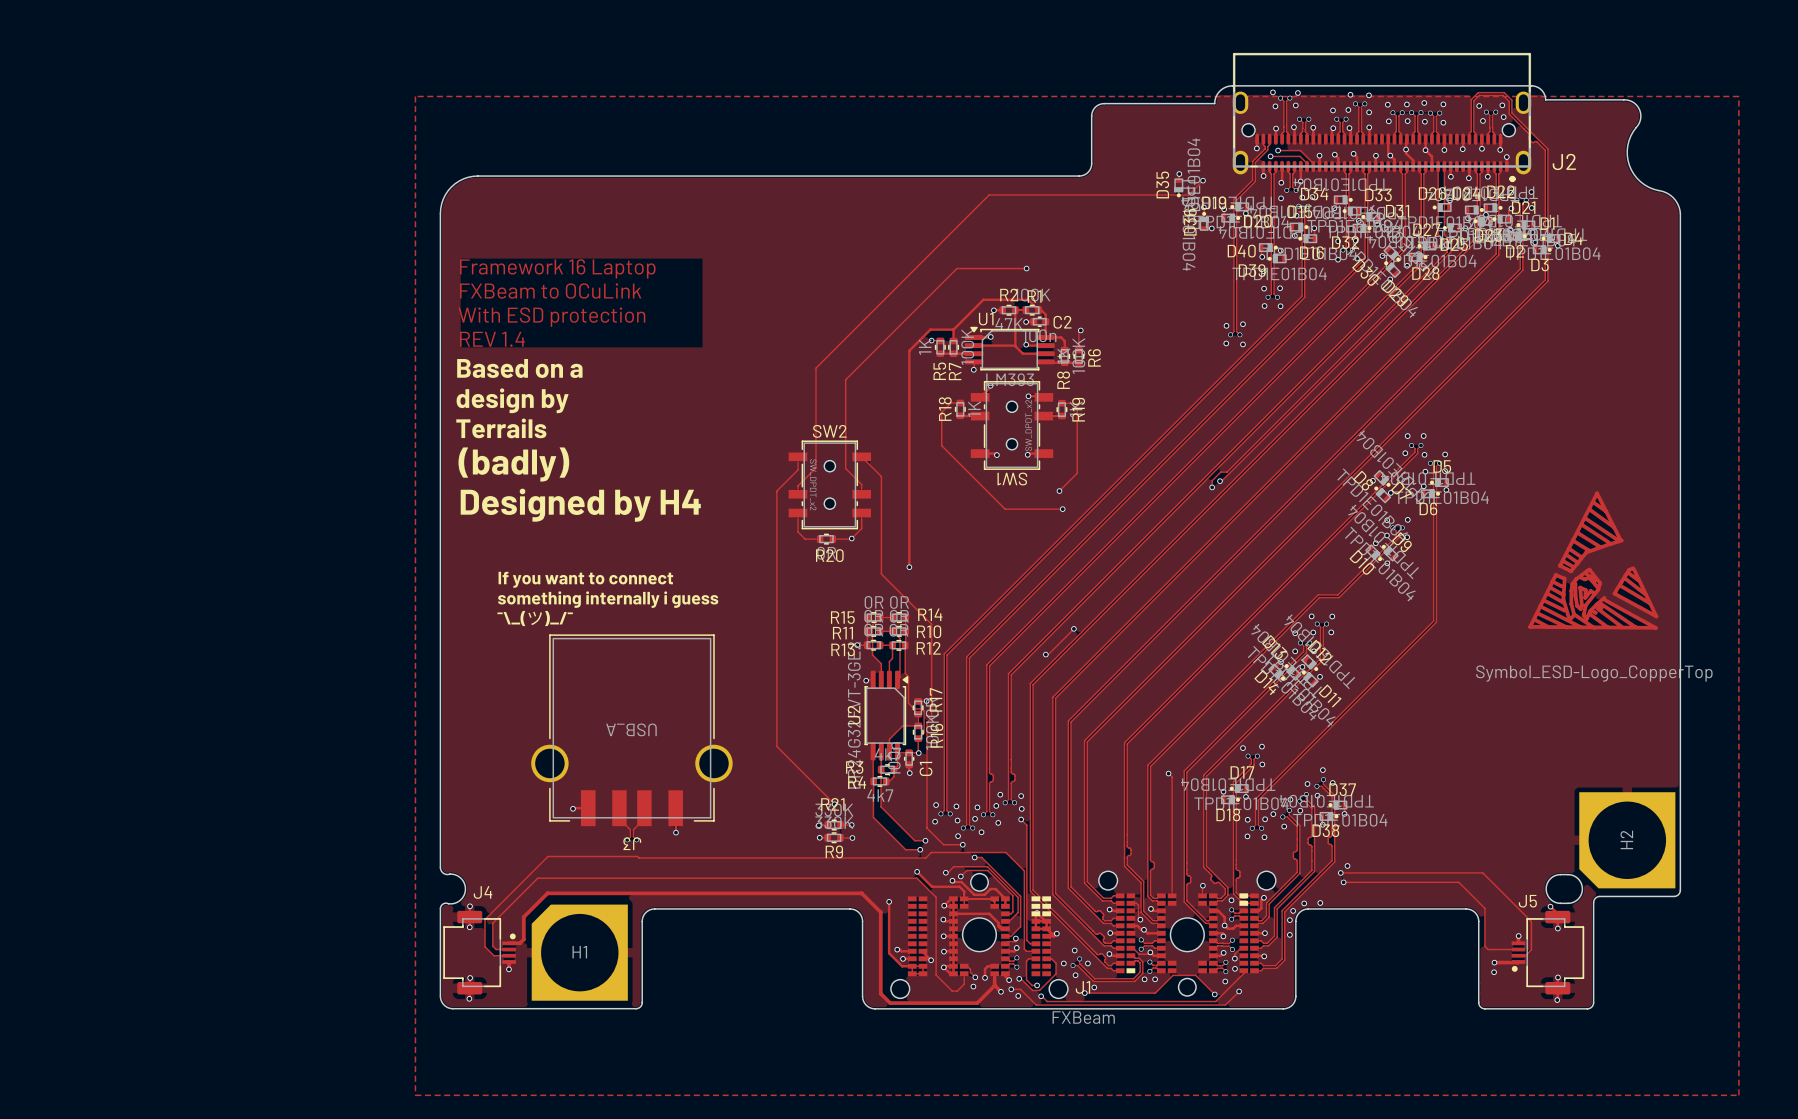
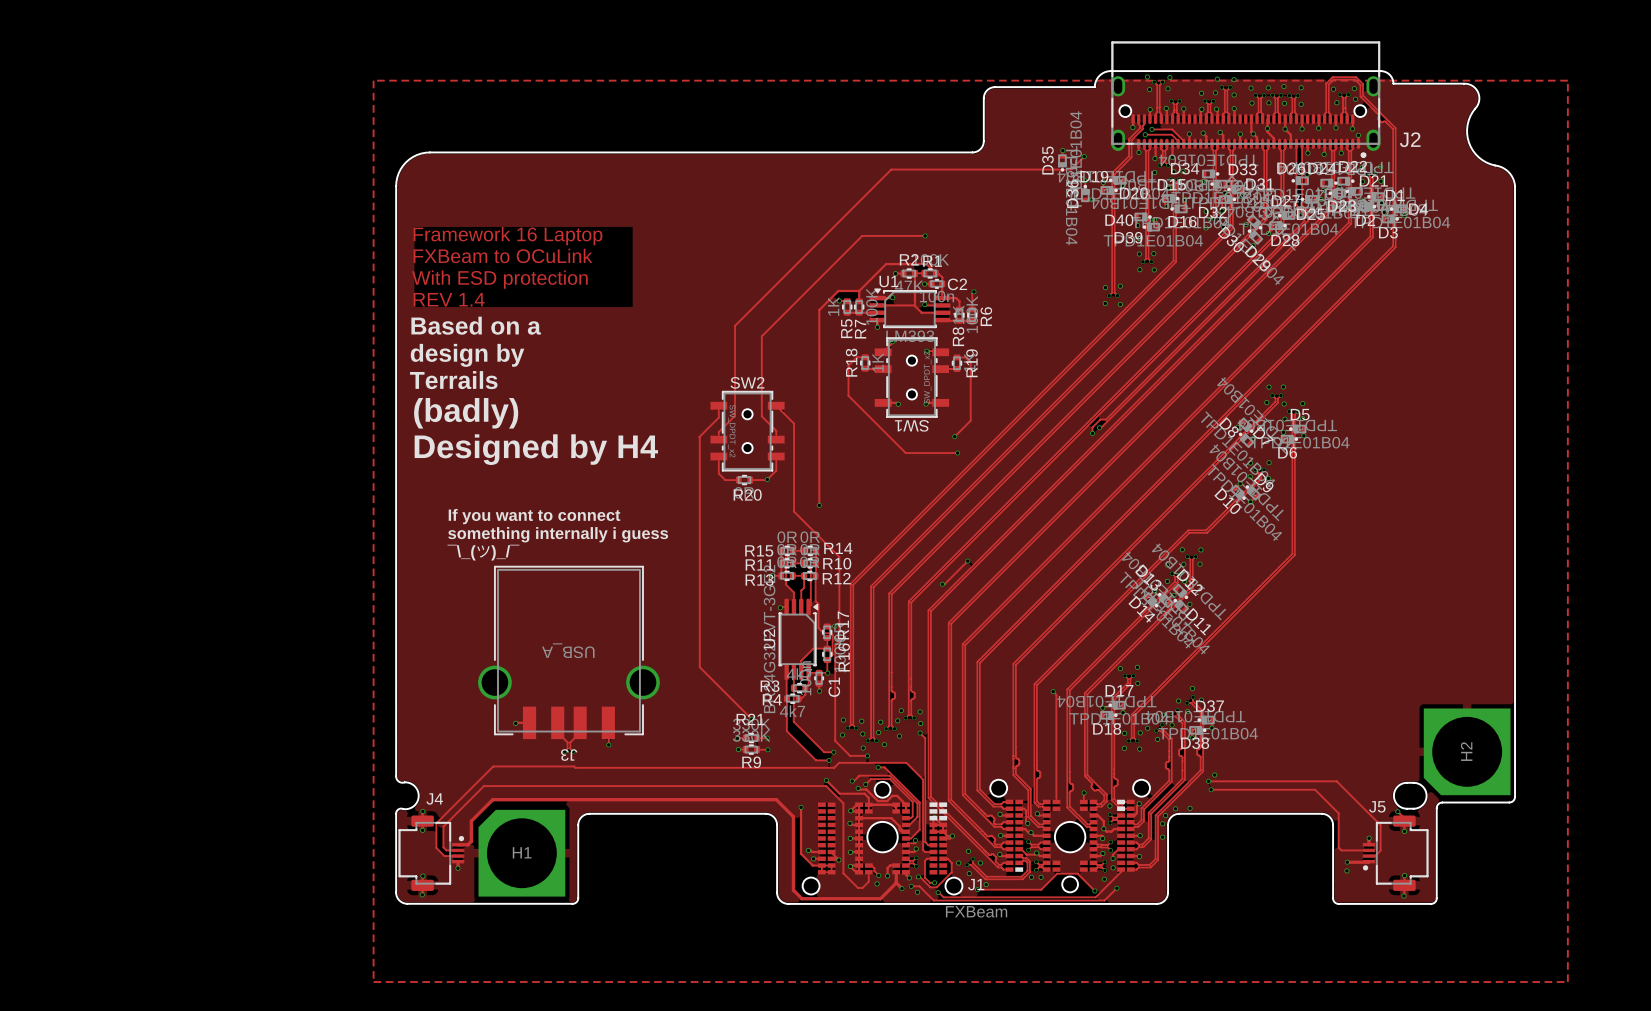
drawing: [1528, 491, 1659, 630] -> none

